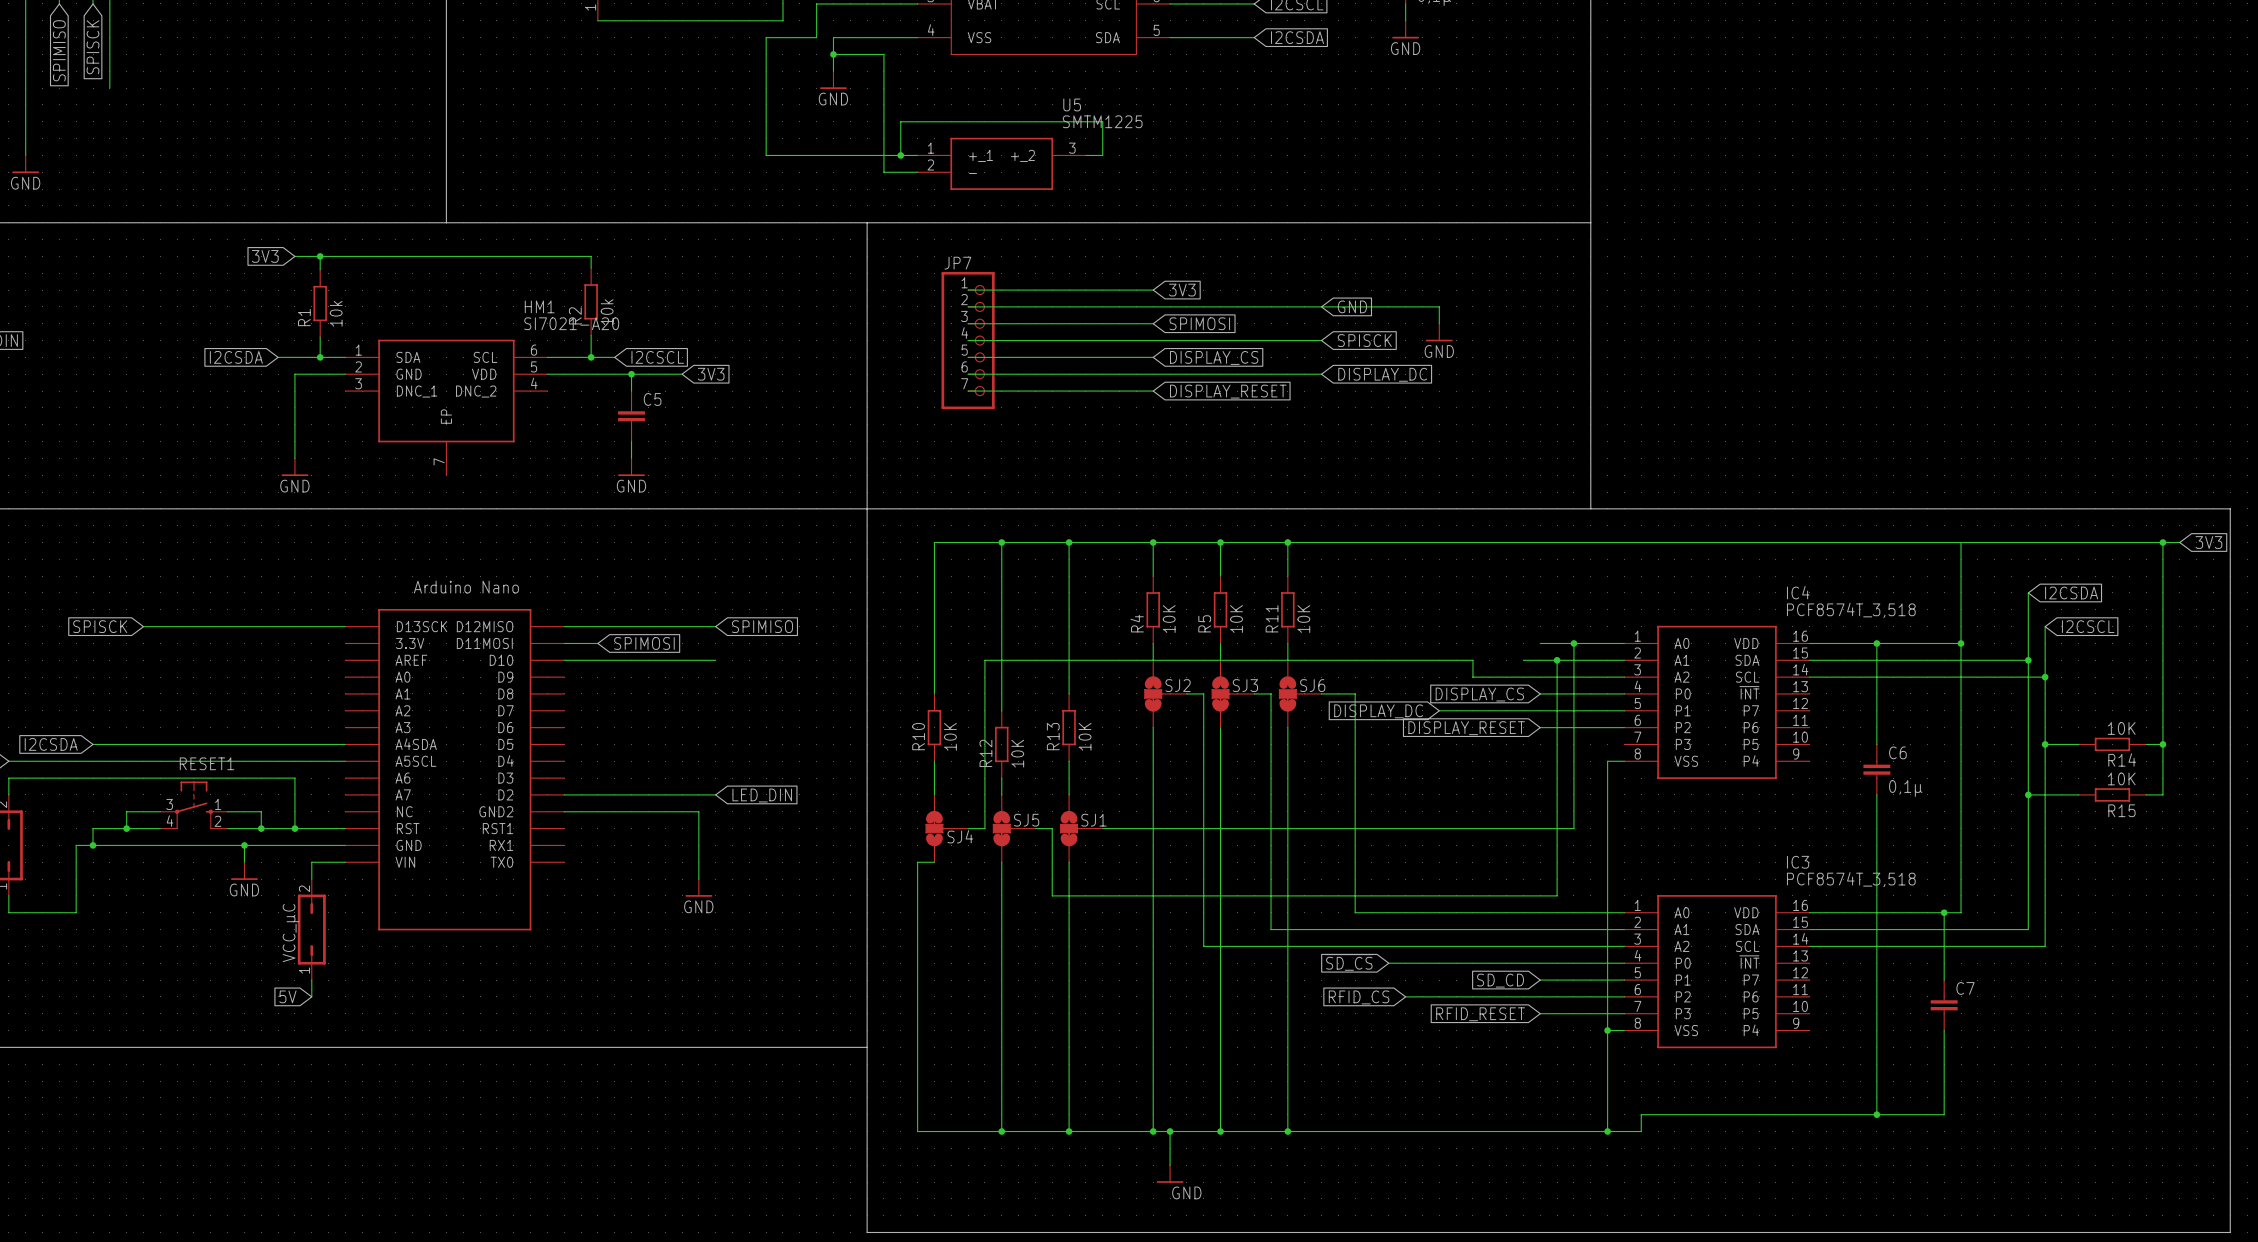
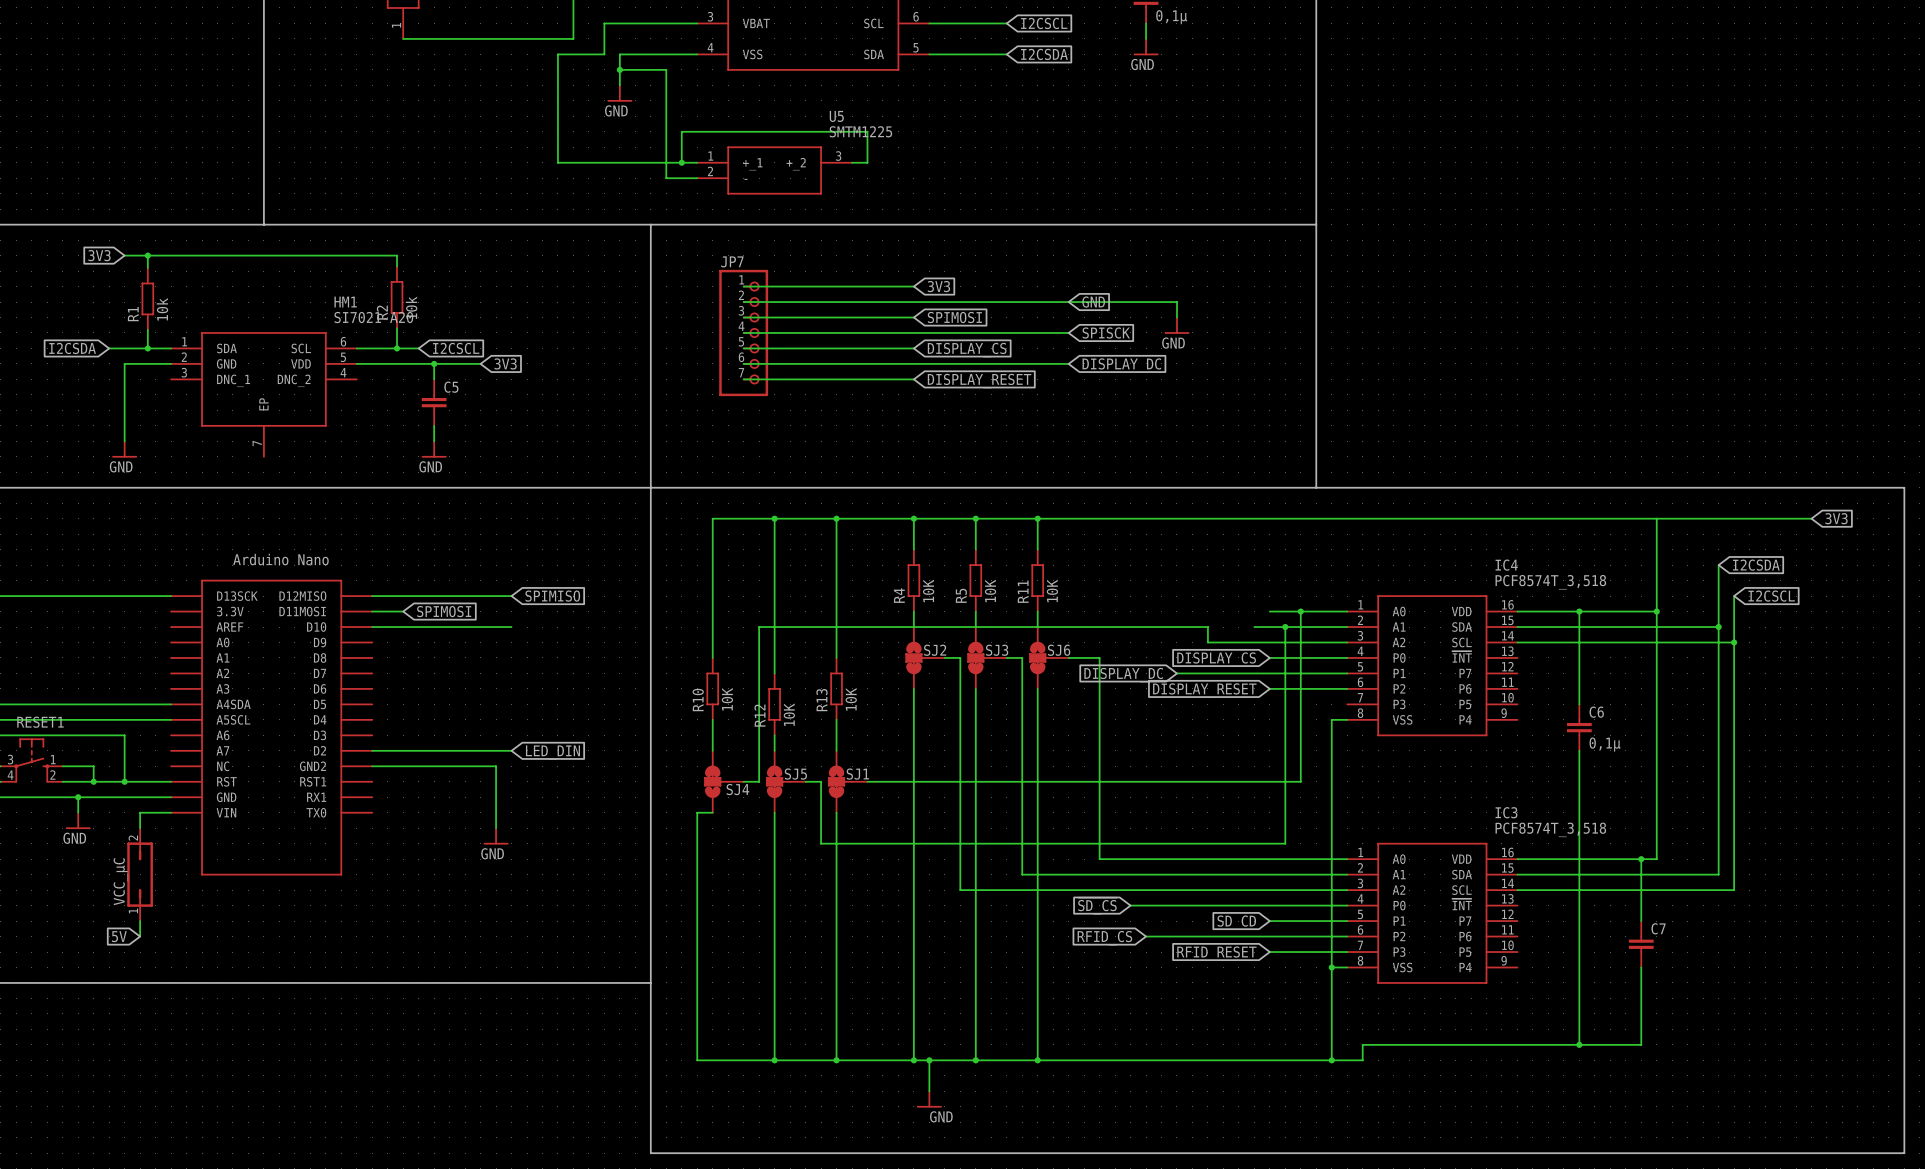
wire: (2129, 542) (2179, 542) -> none
wire: (2162, 542) (2162, 794) (2146, 794) -> none
junction: (2162, 542) -> none
global label position: 3V3 (2208, 542) -> 3V3 (1836, 518)
wire: (2045, 744) (2078, 744) -> none
junction: (2045, 744) -> none
R14: 10K (2112, 744) -> none
wire: (2146, 744) (2162, 744) -> none
junction: (2162, 744) -> none
wire: (2028, 794) (2078, 794) -> none
junction: (2028, 794) -> none
R15: 10K (2112, 794) -> none

